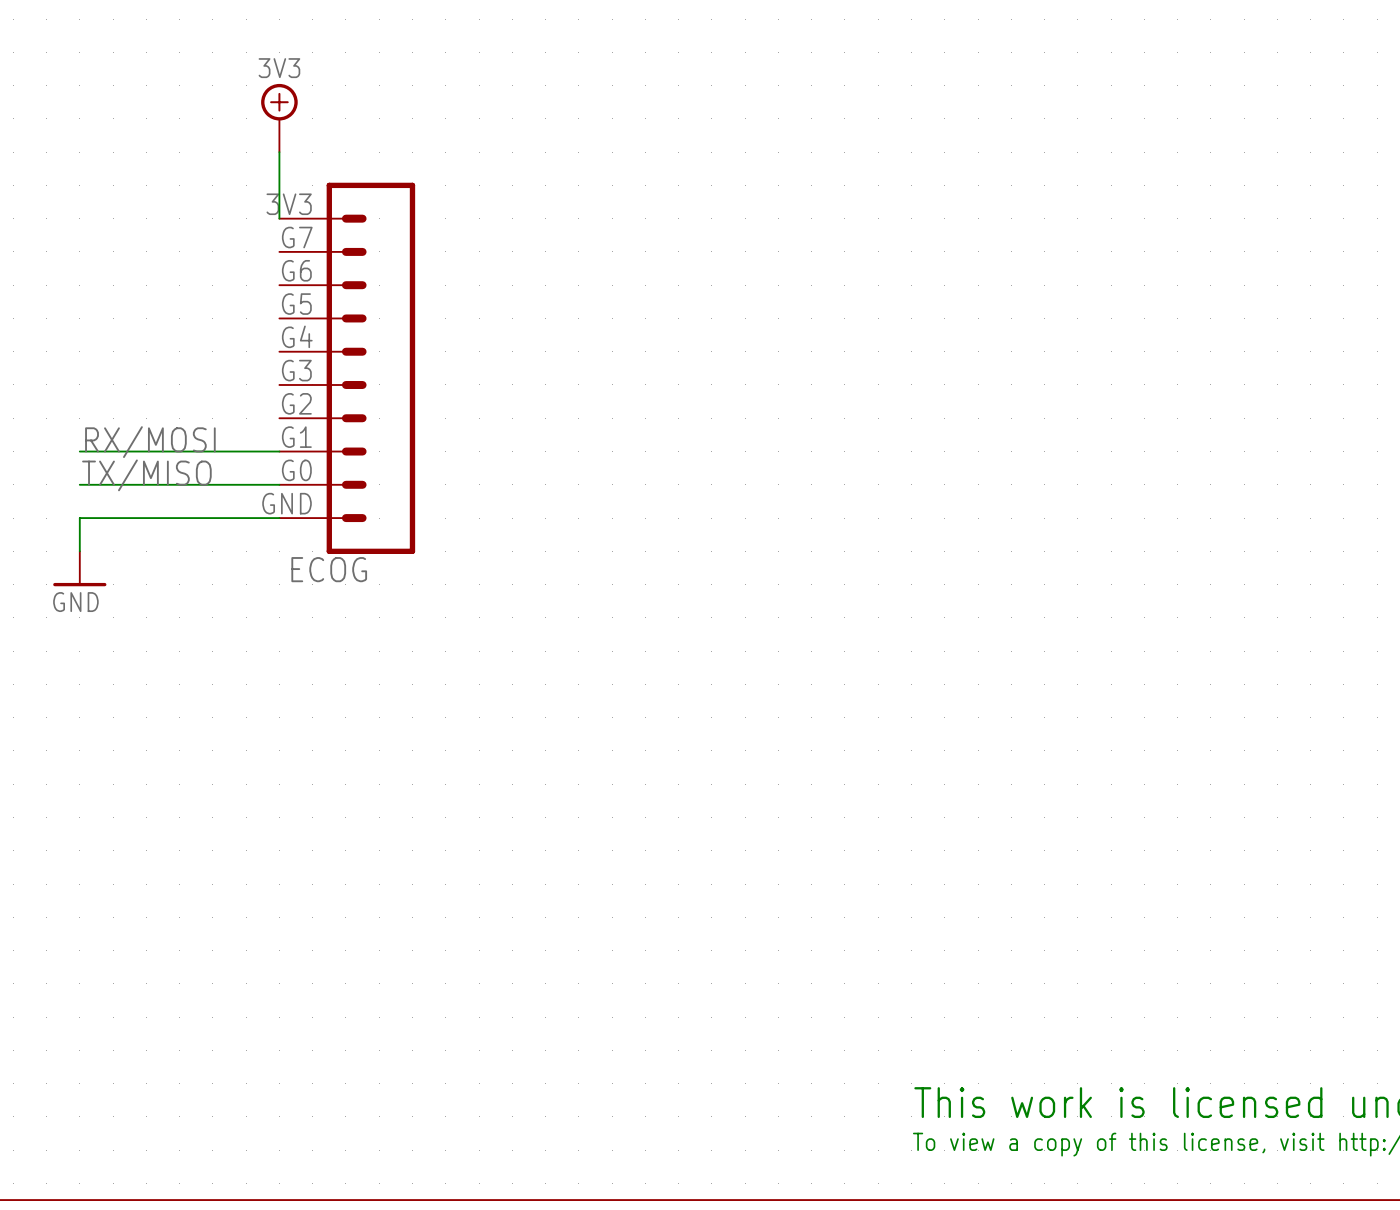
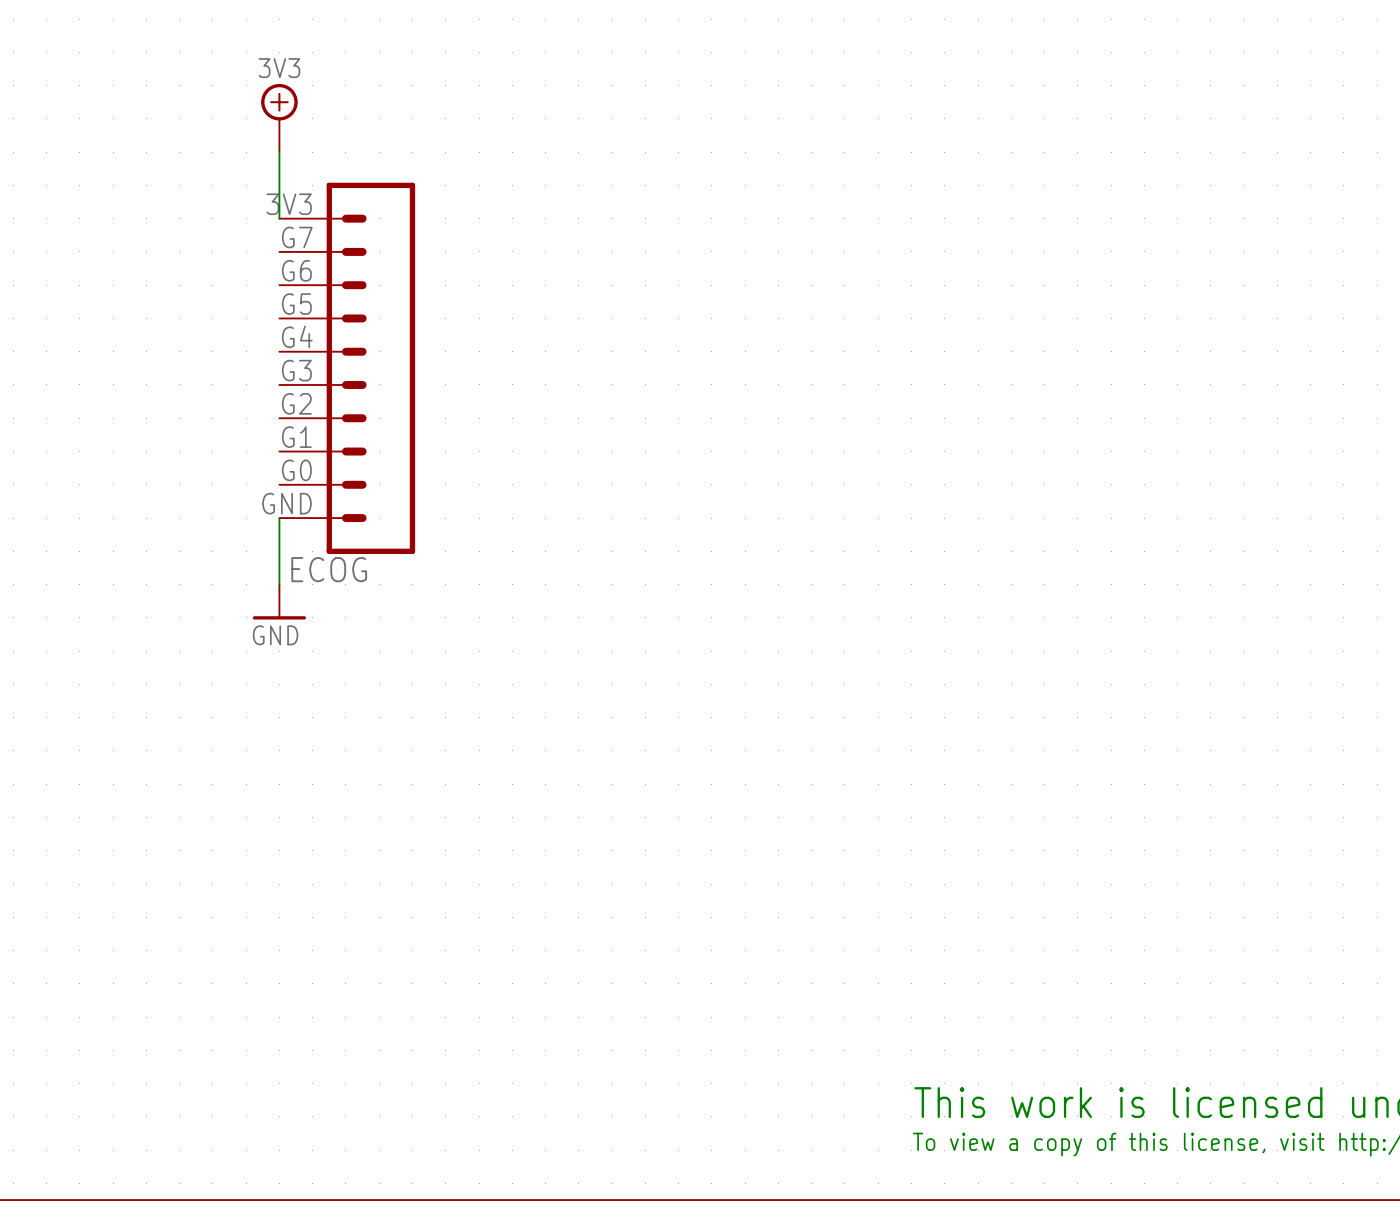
label: RX/MOSI (150, 442) -> none
wire: (79, 451) (279, 451) -> none
label: TX/MISO (146, 475) -> none
wire: (79, 484) (279, 484) -> none
wire: (279, 518) (79, 518) (79, 551) -> (279, 518) (279, 584)
power symbol position: GND (79, 568) -> GND (279, 602)

